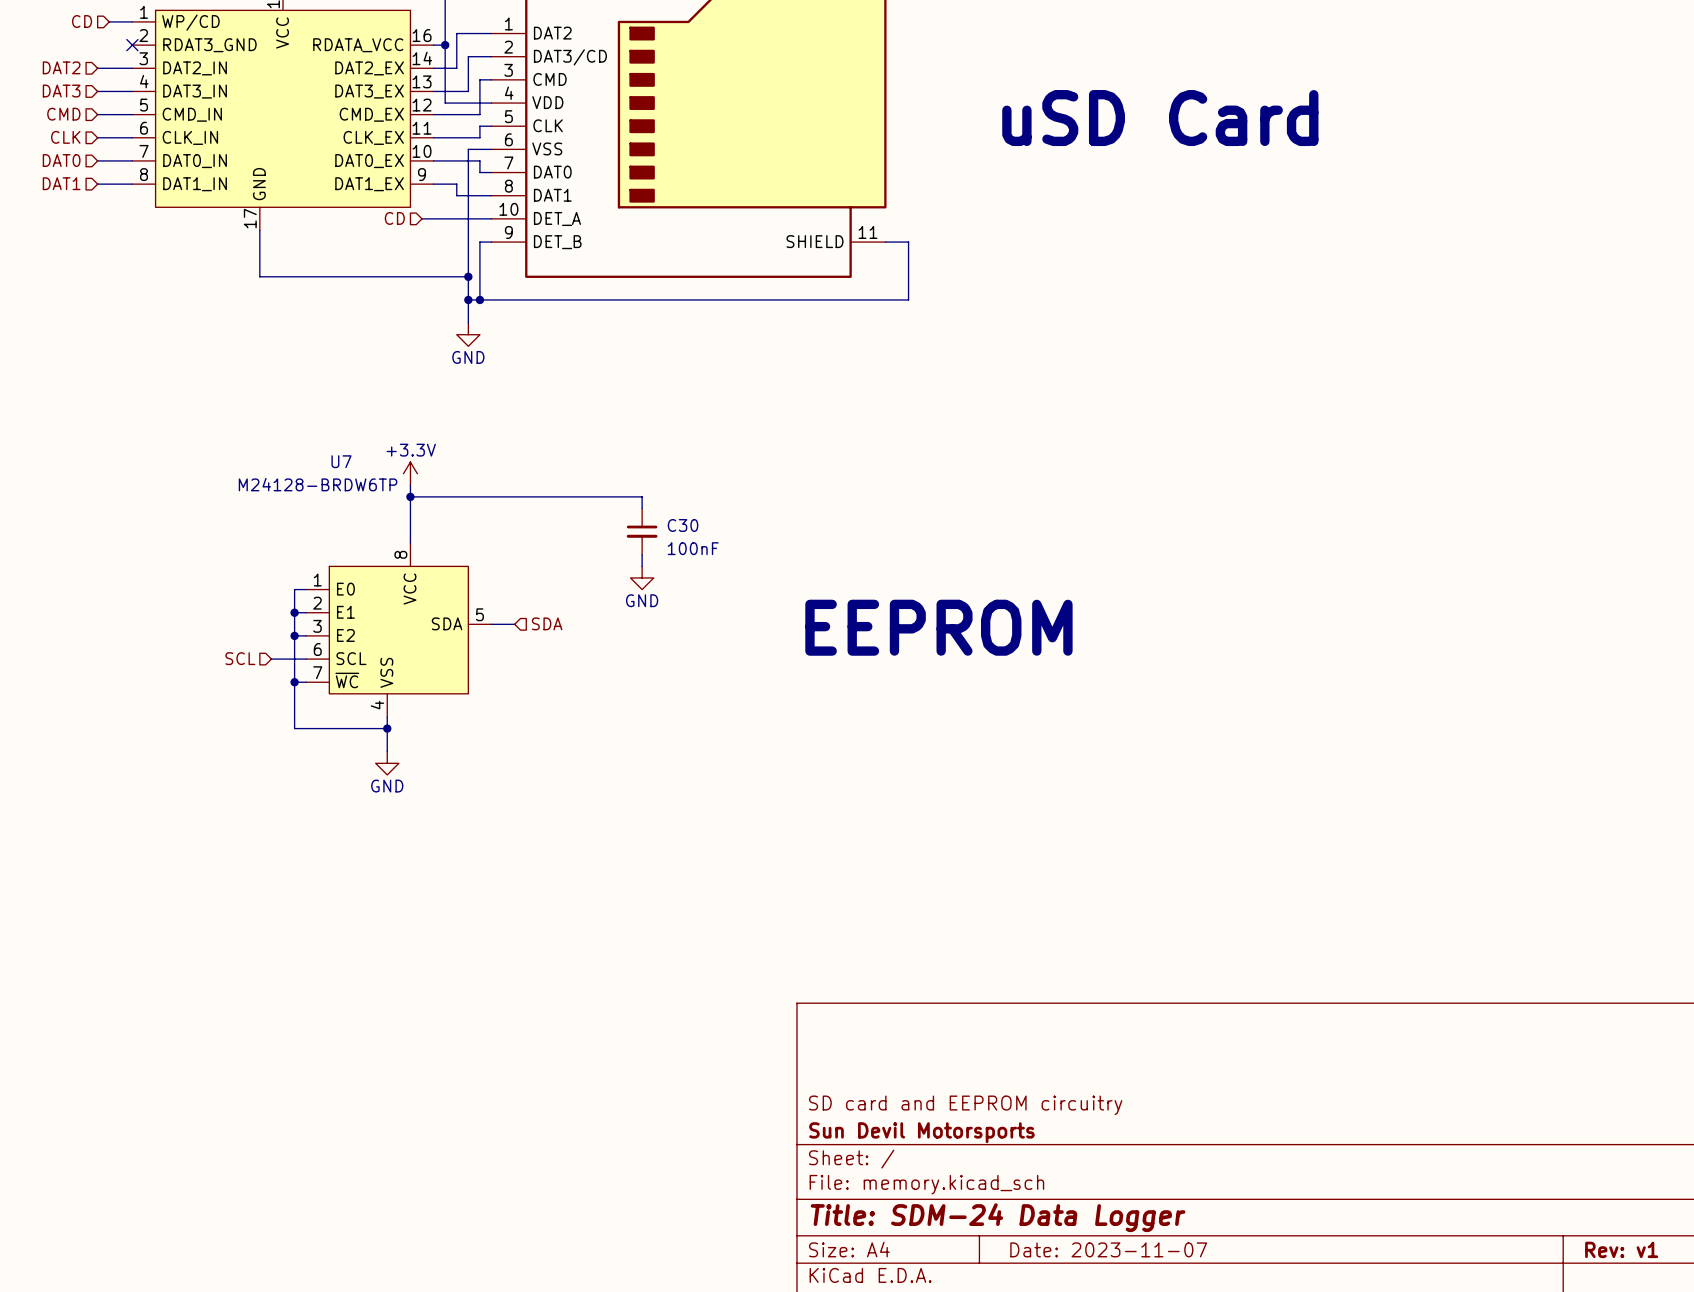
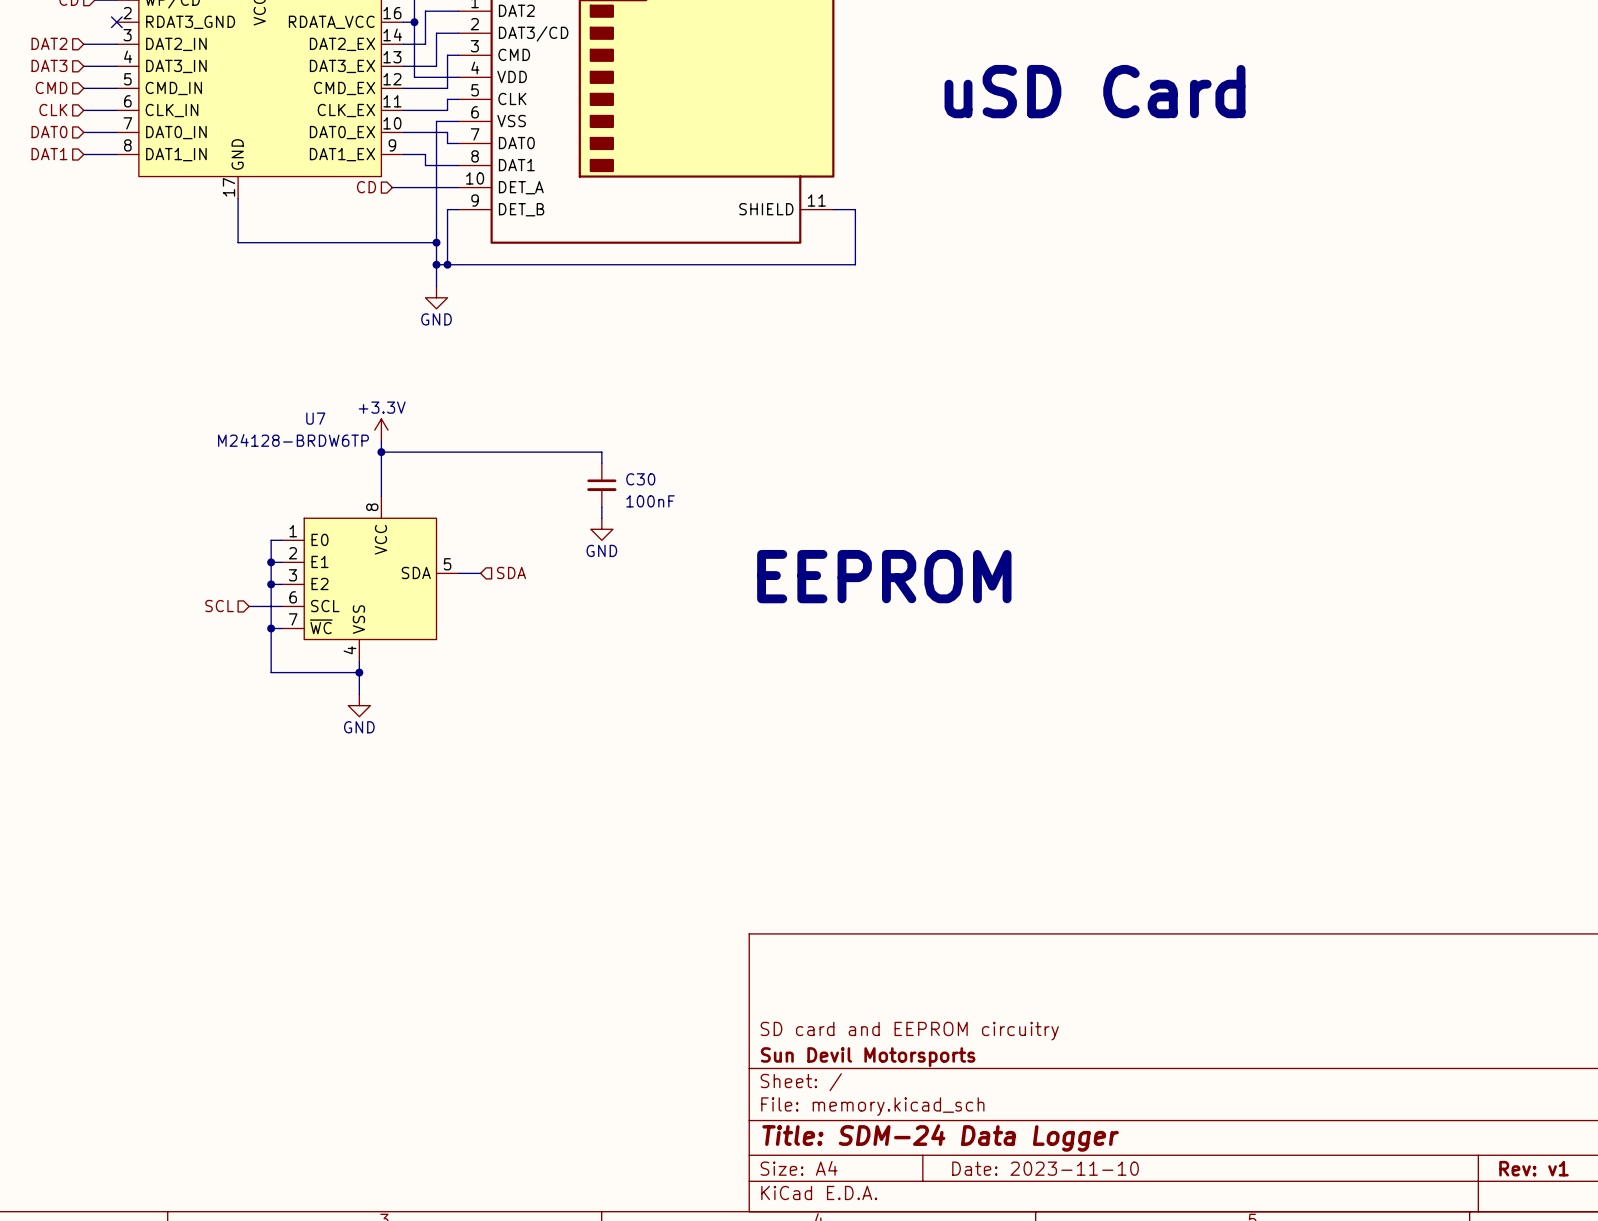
title block: Date: 2023-11-07 (1108, 1249) -> Date: 2023-11-10 (1045, 1168)

